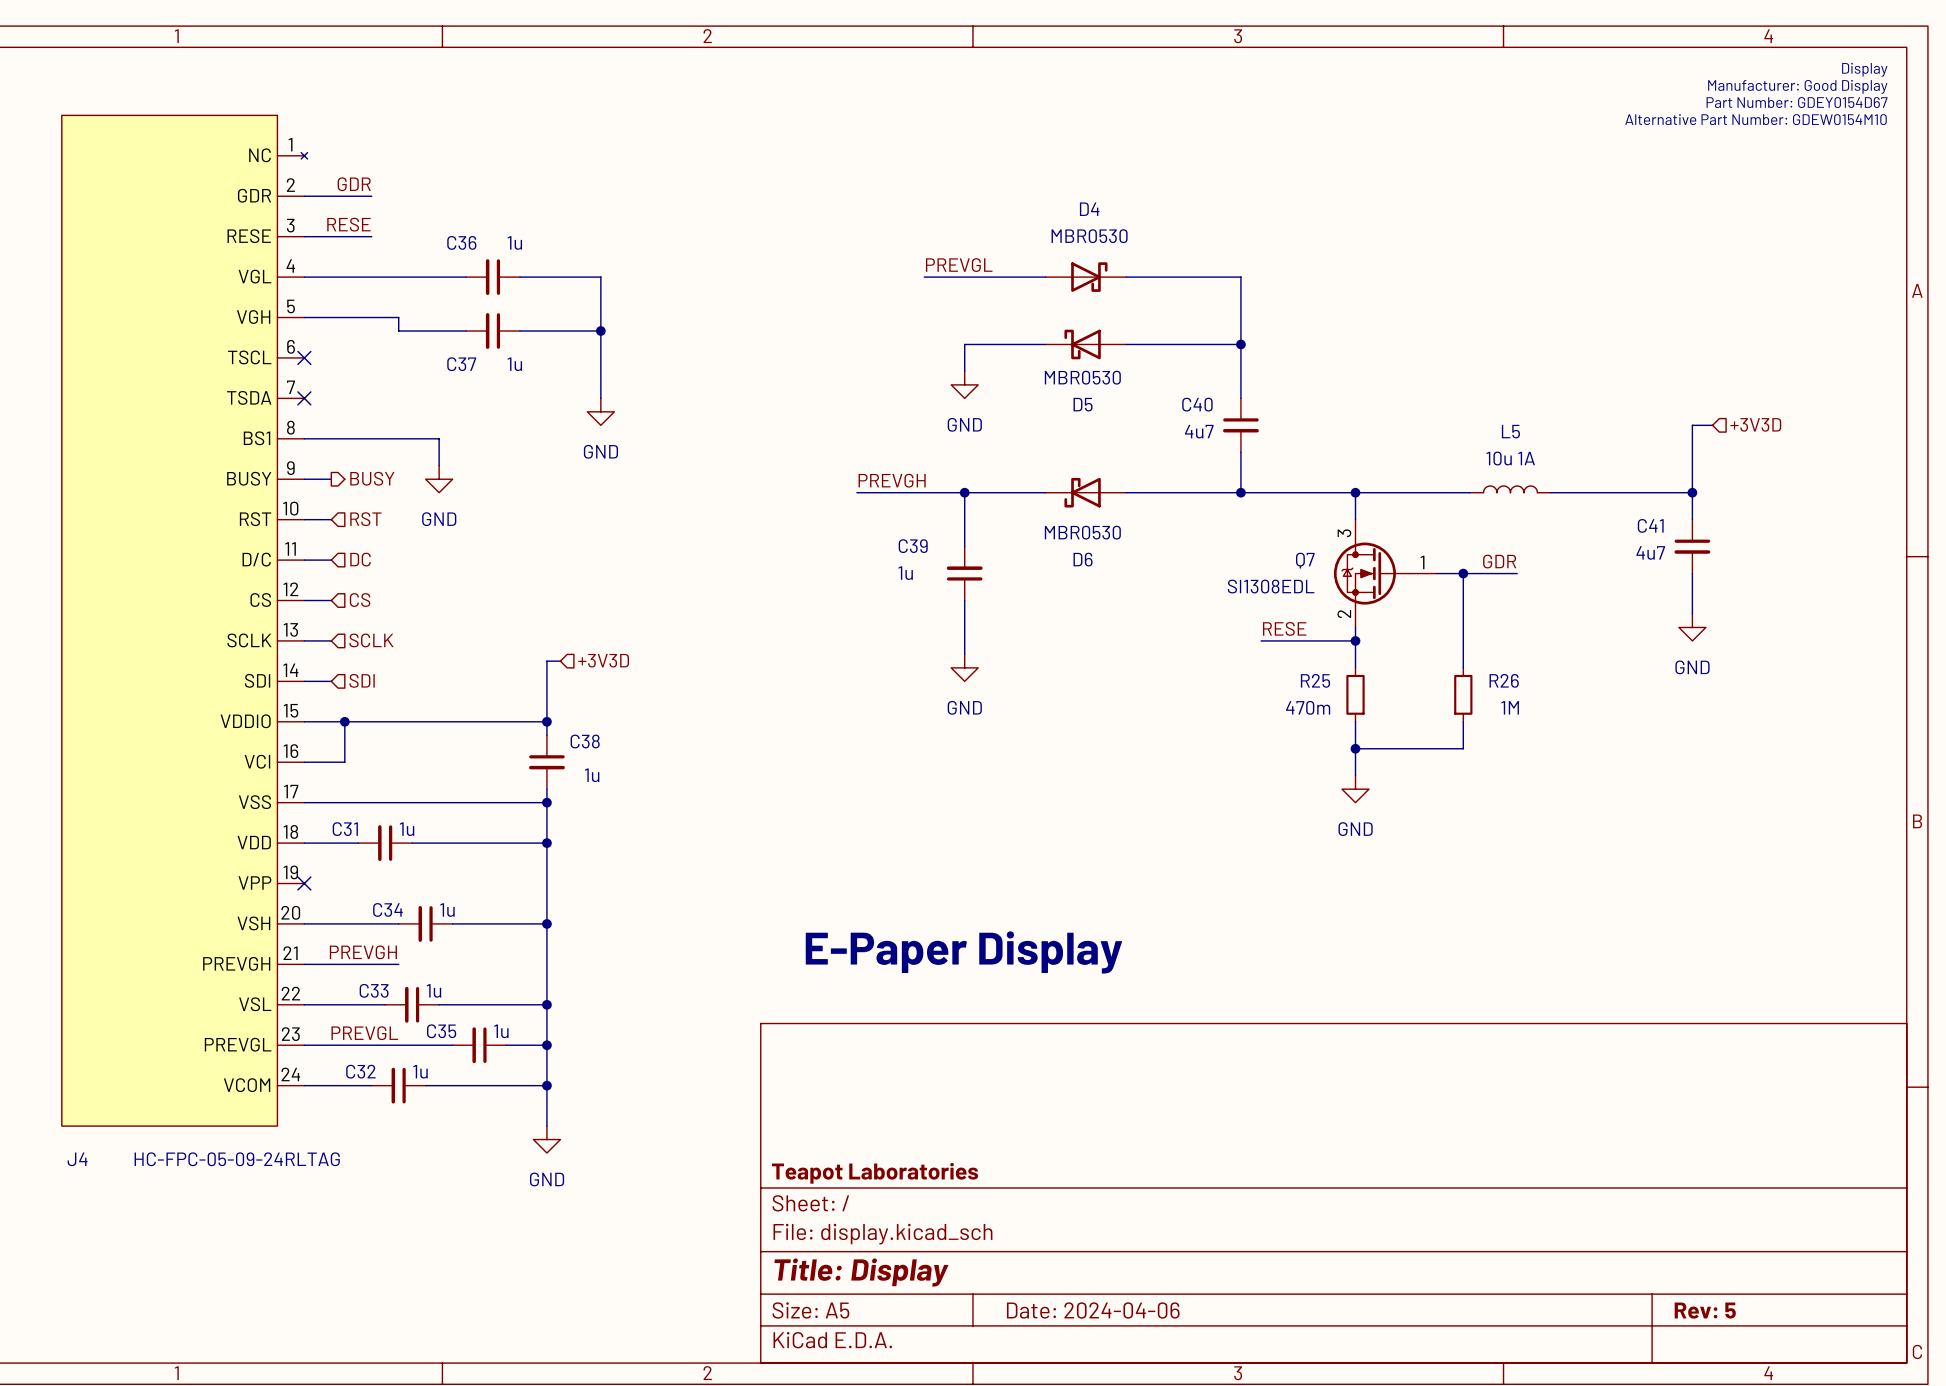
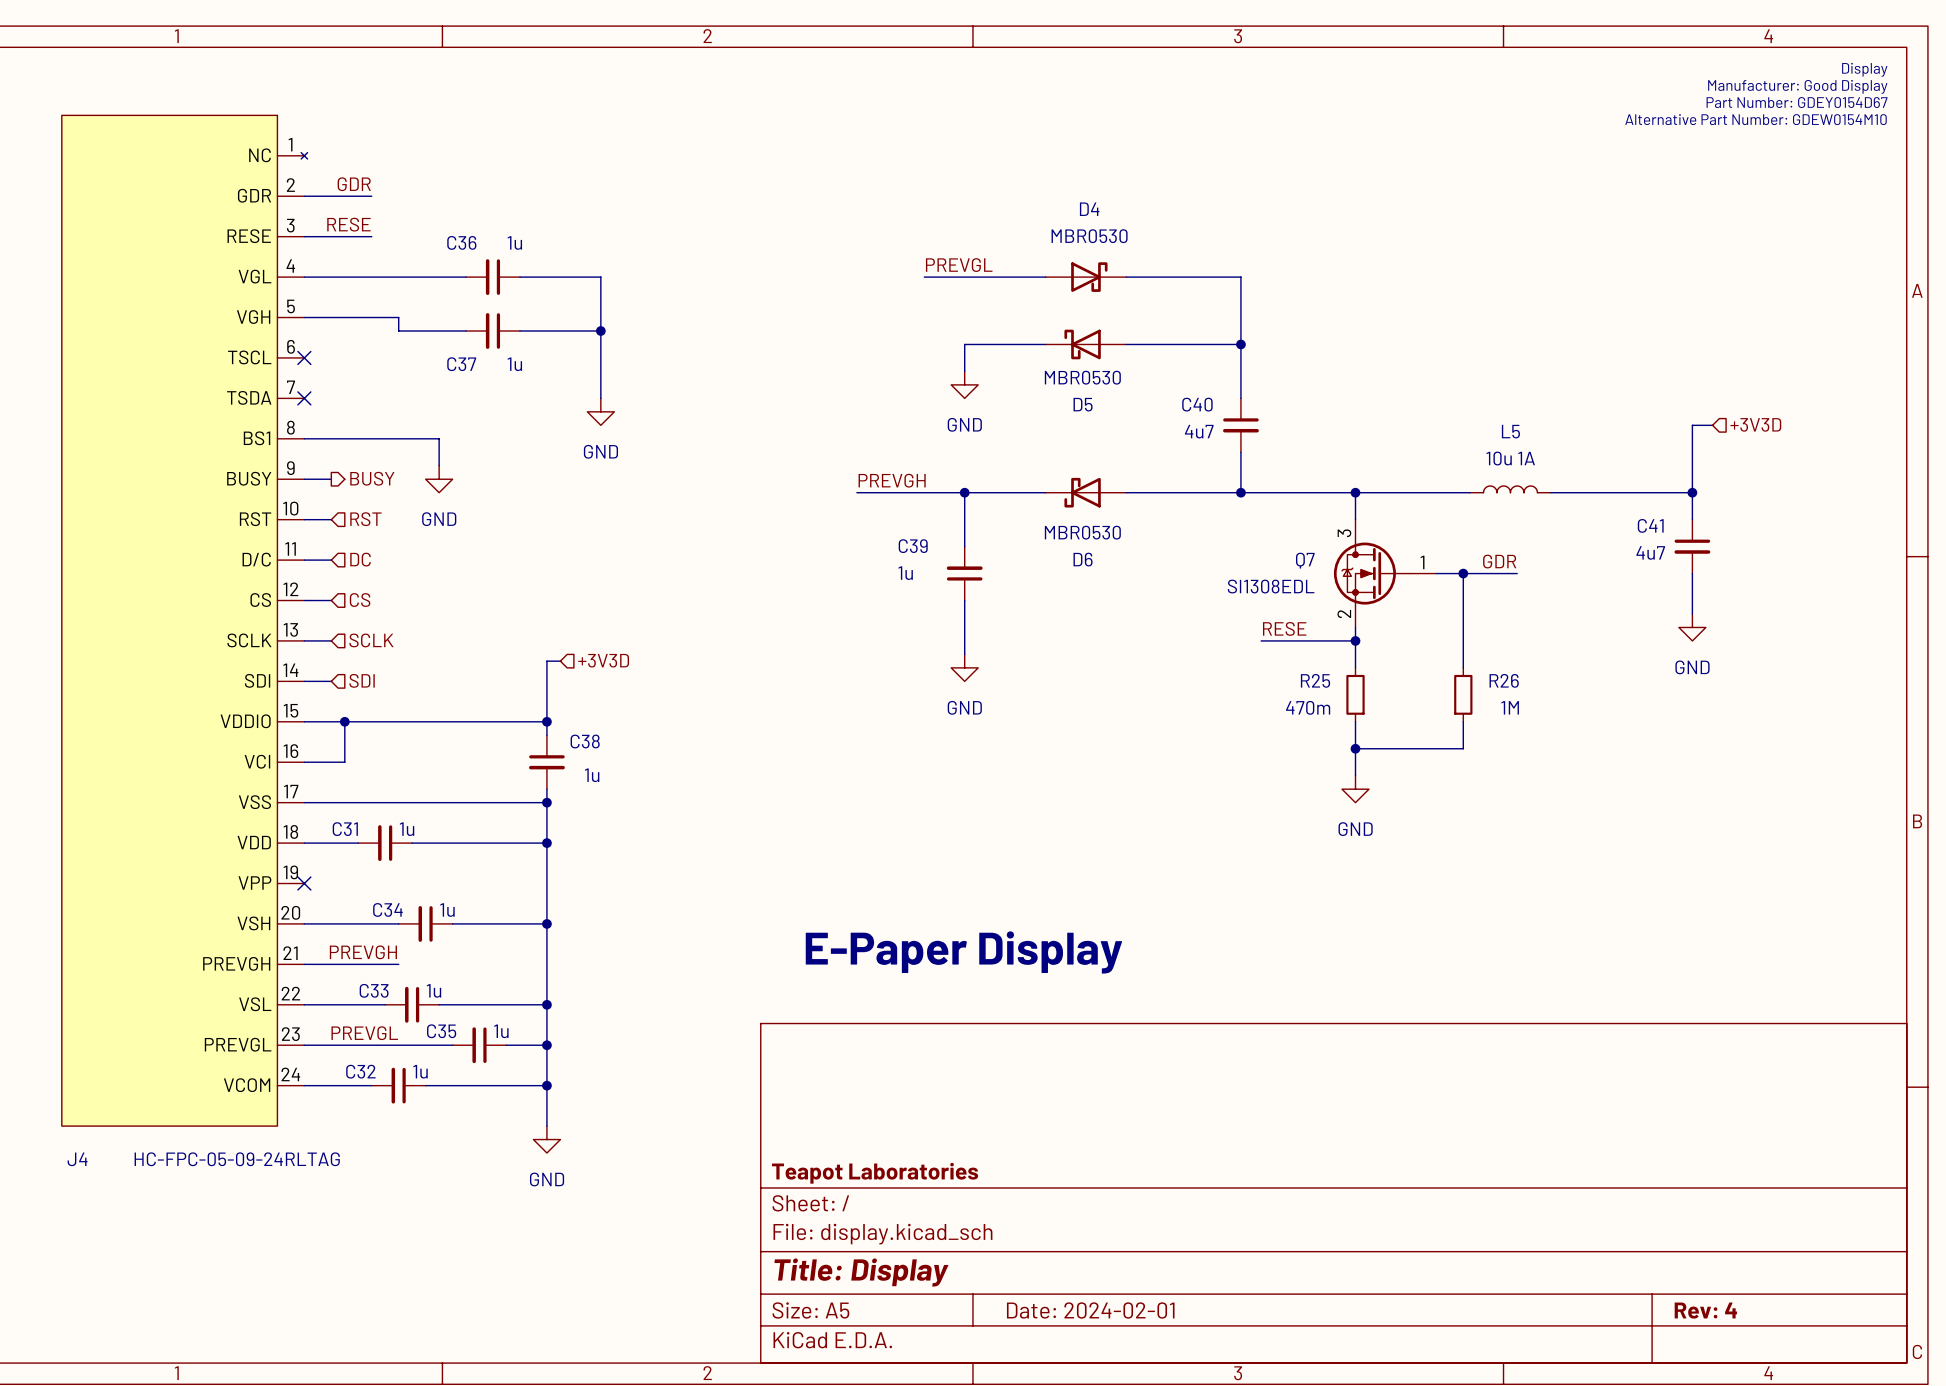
title block: Date: 2024-04-06 (1093, 1310) -> Date: 2024-02-01 (1090, 1310)
title block: Rev: 5 (1705, 1310) -> Rev: 4 (1705, 1310)

